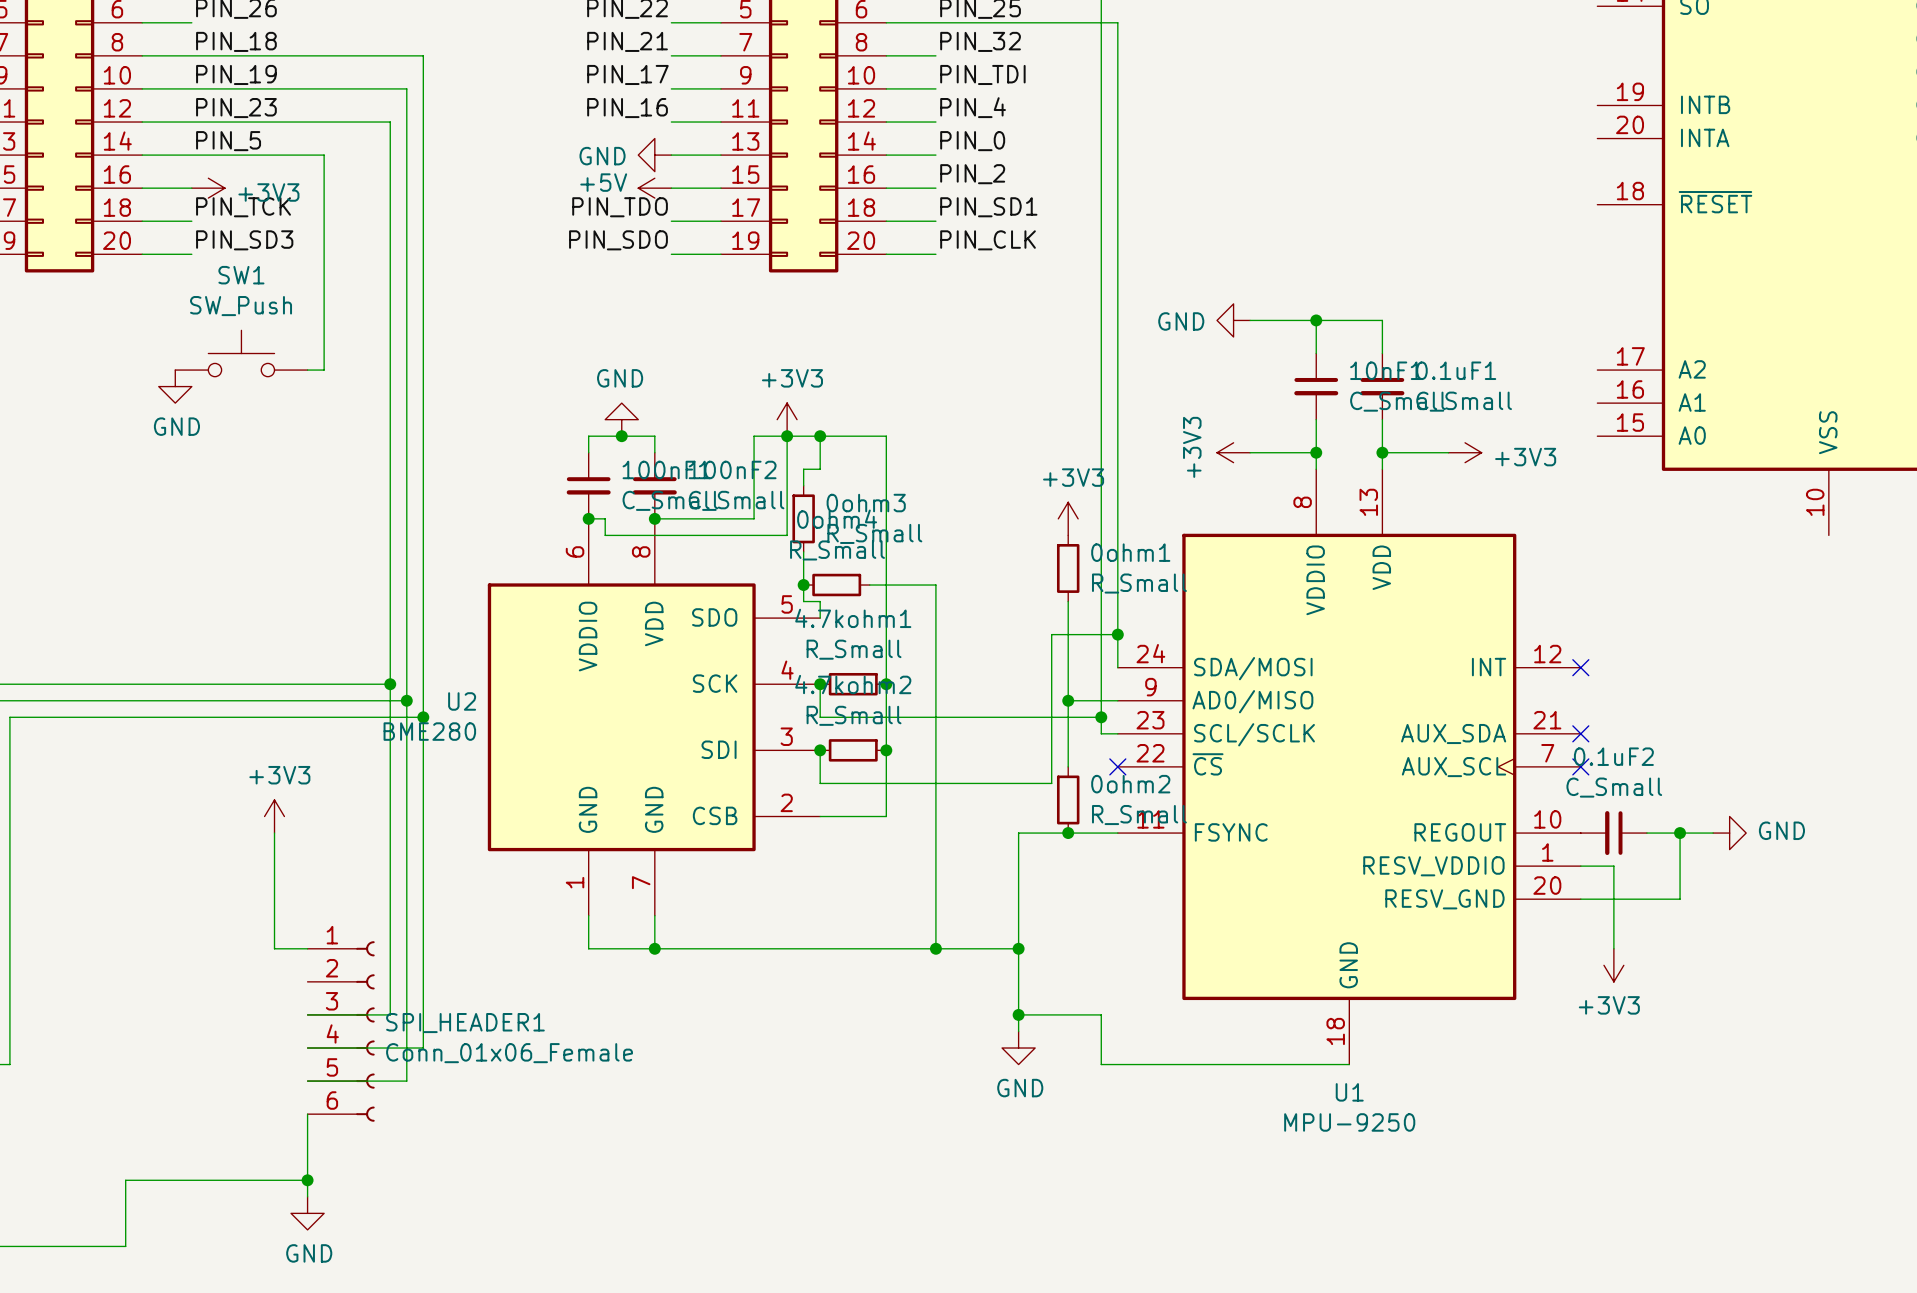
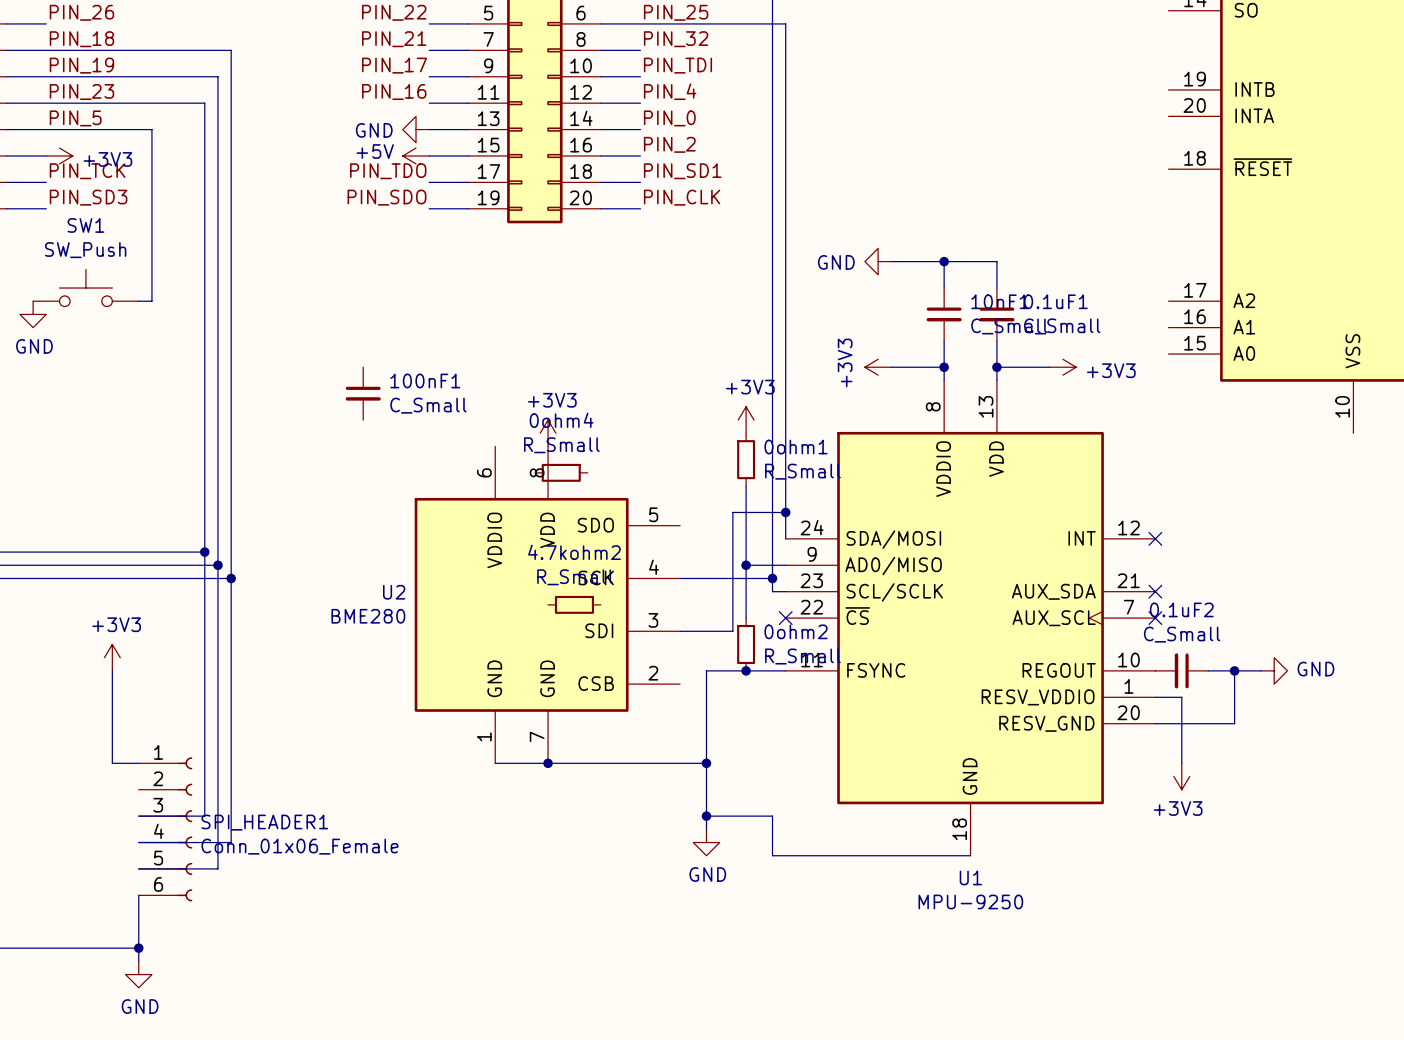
power symbol: GND (621, 419) -> none
power symbol position: +3V3 (787, 419) -> +3V3 (548, 433)
junction: (621, 436) -> none
wire: (787, 436) (787, 535) (605, 535) (605, 518) (588, 518) -> none
junction: (787, 436) -> none
wire: (820, 436) (820, 469) (803, 469) (803, 485) -> none
junction: (820, 436) -> none
wire: (588, 452) (588, 436) (654, 436) (654, 452) -> none
100nF2: C_Small (654, 485) -> none
junction: (588, 518) -> none
wire: (654, 518) (754, 518) (754, 436) (886, 436) (886, 816) (820, 816) -> none
junction: (654, 518) -> none
0ohm3: R_Small (803, 518) -> none
wire: (803, 551) (803, 601) (820, 601) (820, 618) -> none
junction: (803, 585) -> none
wire: (869, 585) (935, 585) (935, 948) -> none
junction: (820, 684) -> none
4.7kohm1: R_Small (853, 684) -> none
junction: (886, 684) -> none
U2 position: (654, 717) -> (547, 604)
junction: (820, 750) -> none
junction: (886, 750) -> none
wire: (588, 915) (588, 948) (754, 948) -> none
wire: (654, 915) (654, 948) -> none
junction: (654, 948) -> none
junction: none -> (548, 763)
junction: (935, 948) -> none

